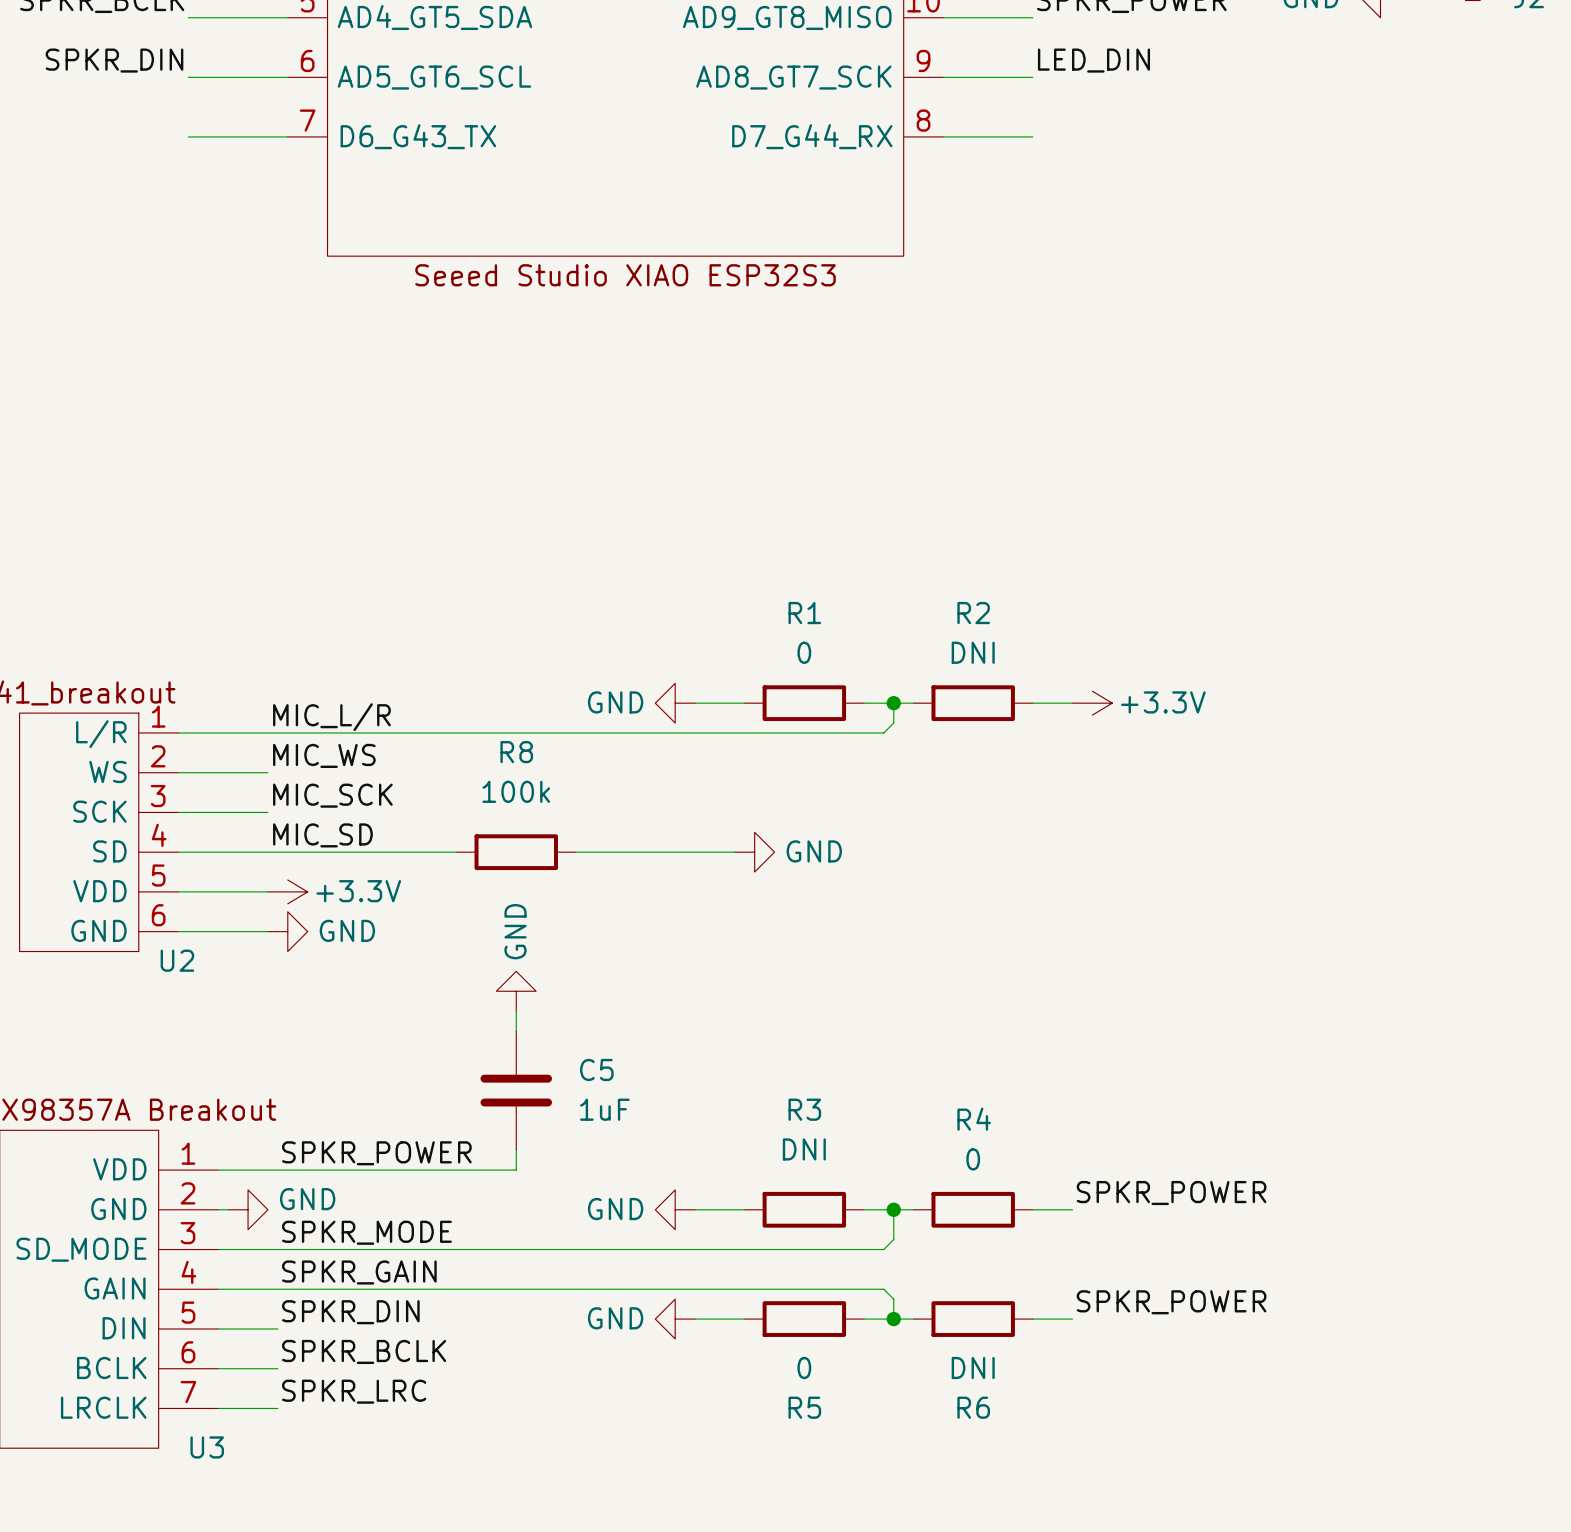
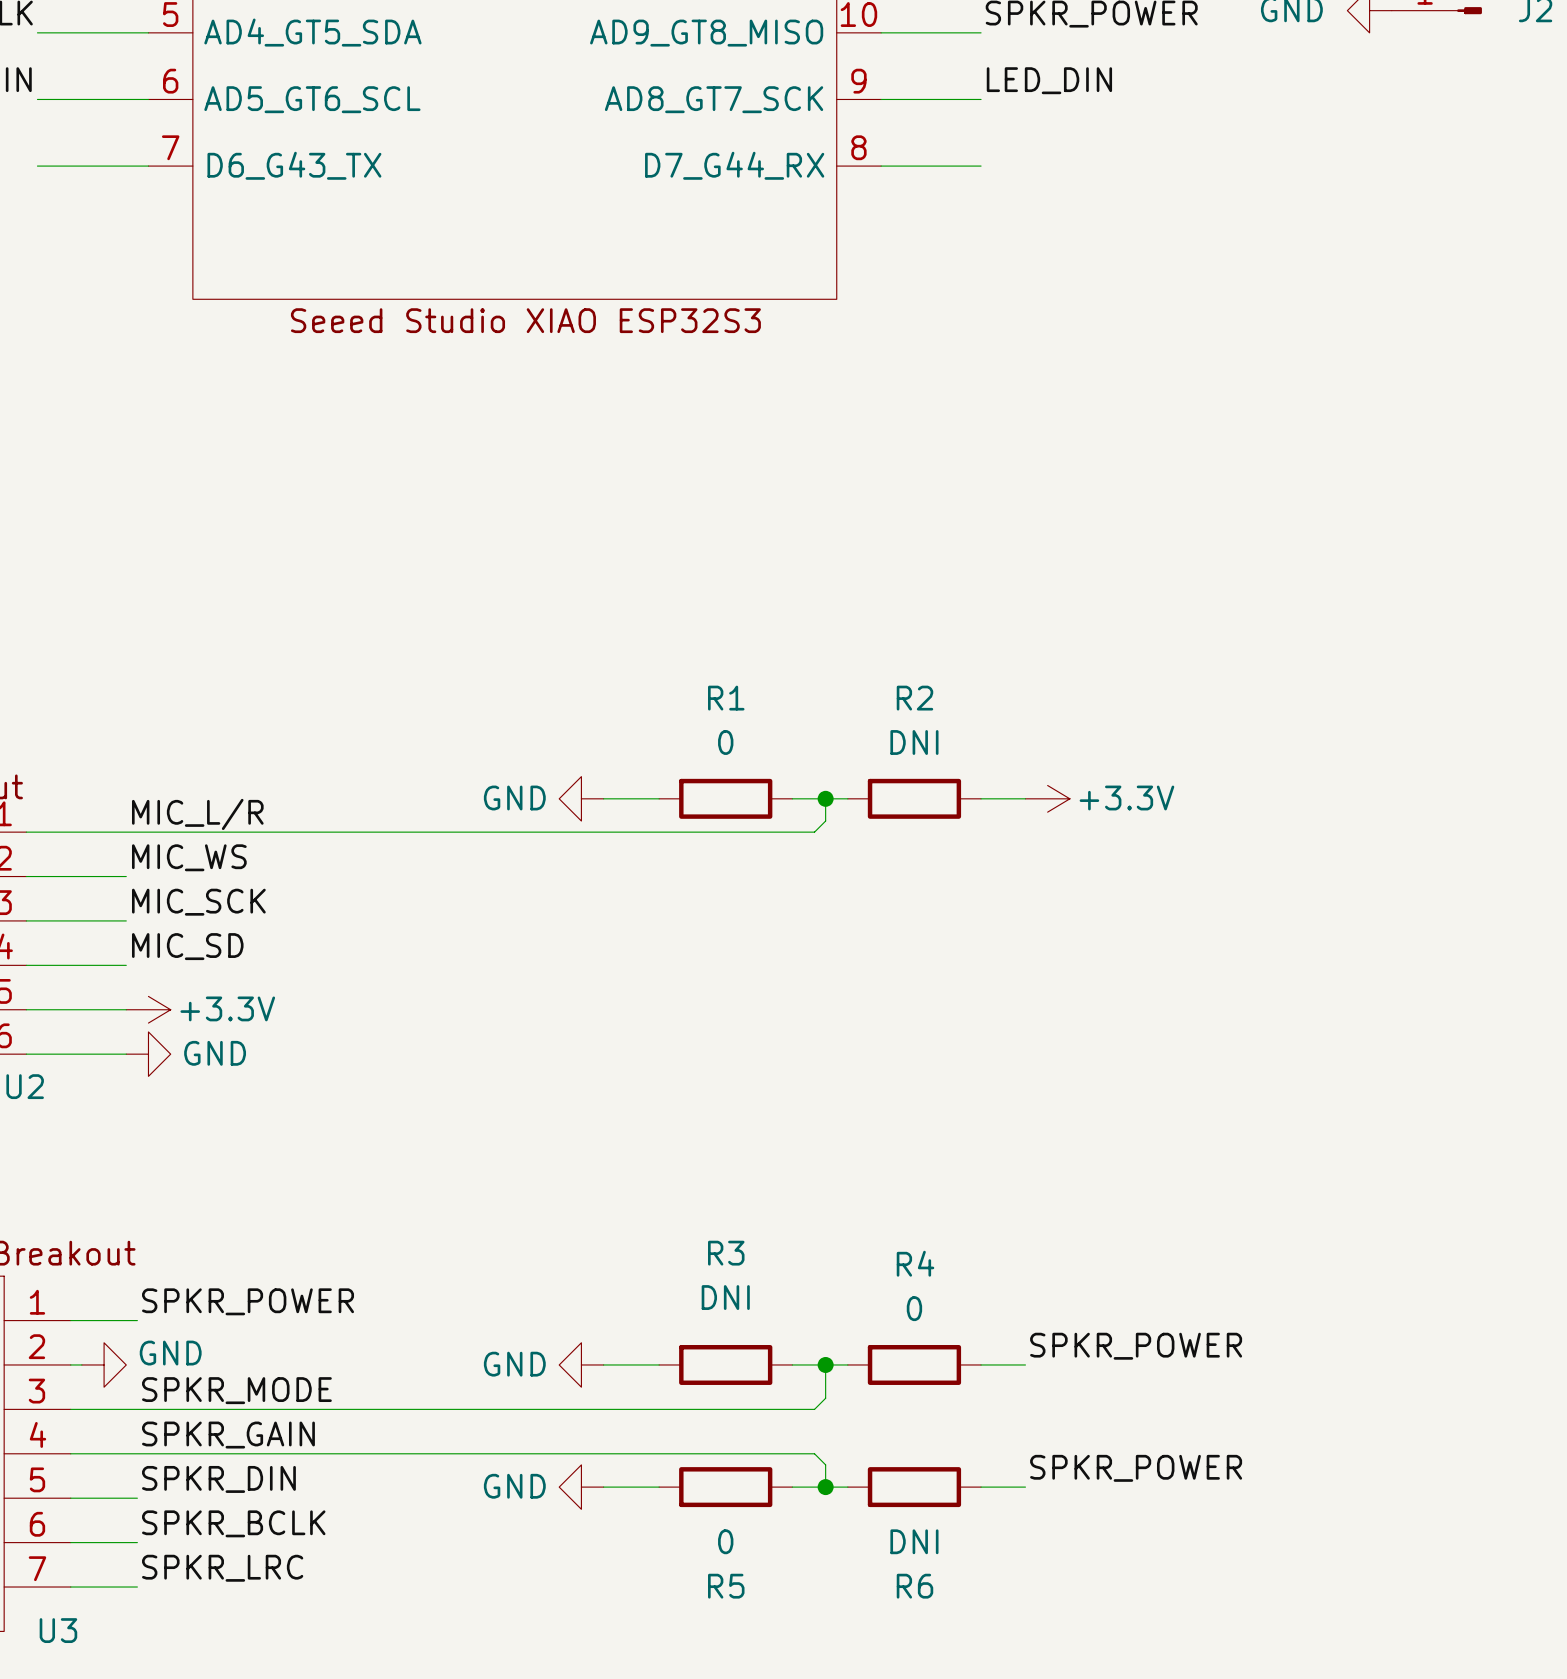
wire: (267, 852) (456, 852) -> none
R8: 100k (516, 852) -> none
wire: (575, 852) (734, 852) -> none
power symbol: GND (754, 852) -> none
power symbol: GND (516, 991) -> none
wire: (516, 1011) (516, 1030) -> none
C5: 1uF (516, 1090) -> none
wire: (516, 1150) (516, 1170) (277, 1170) -> none

